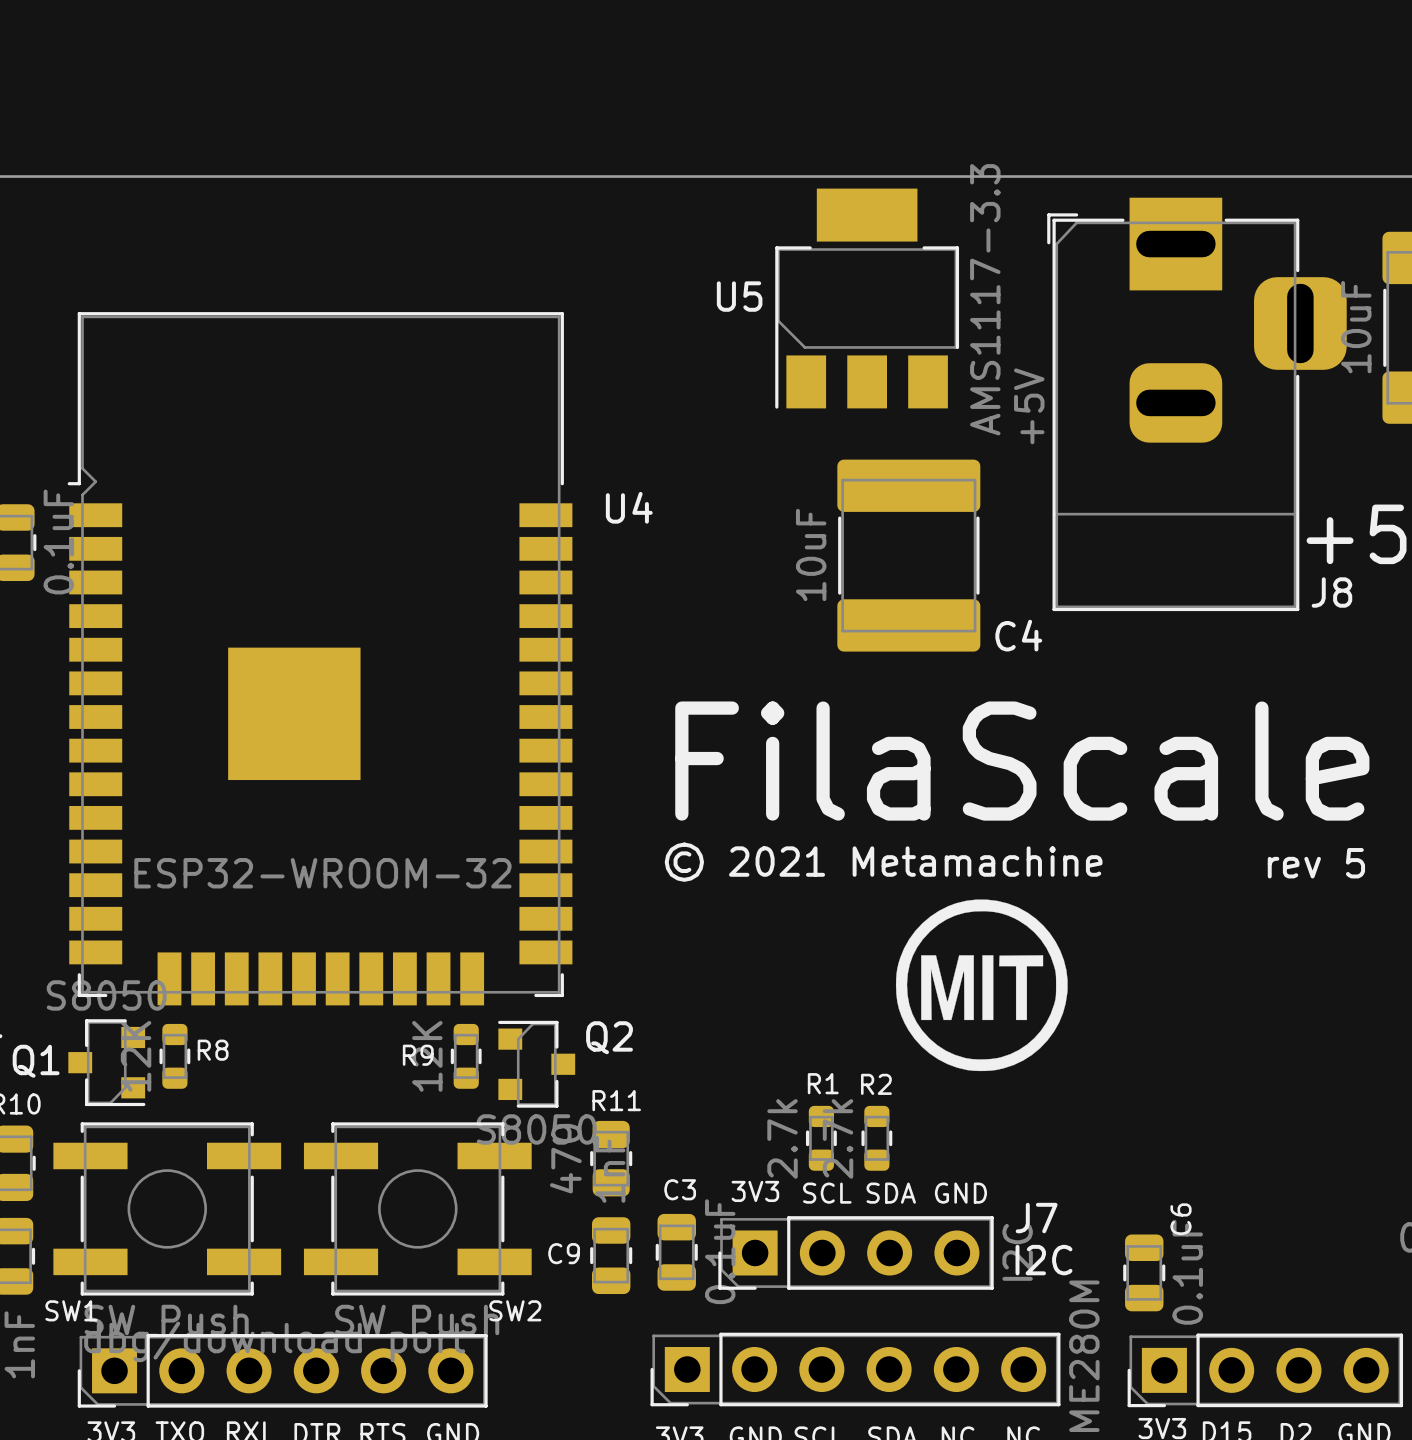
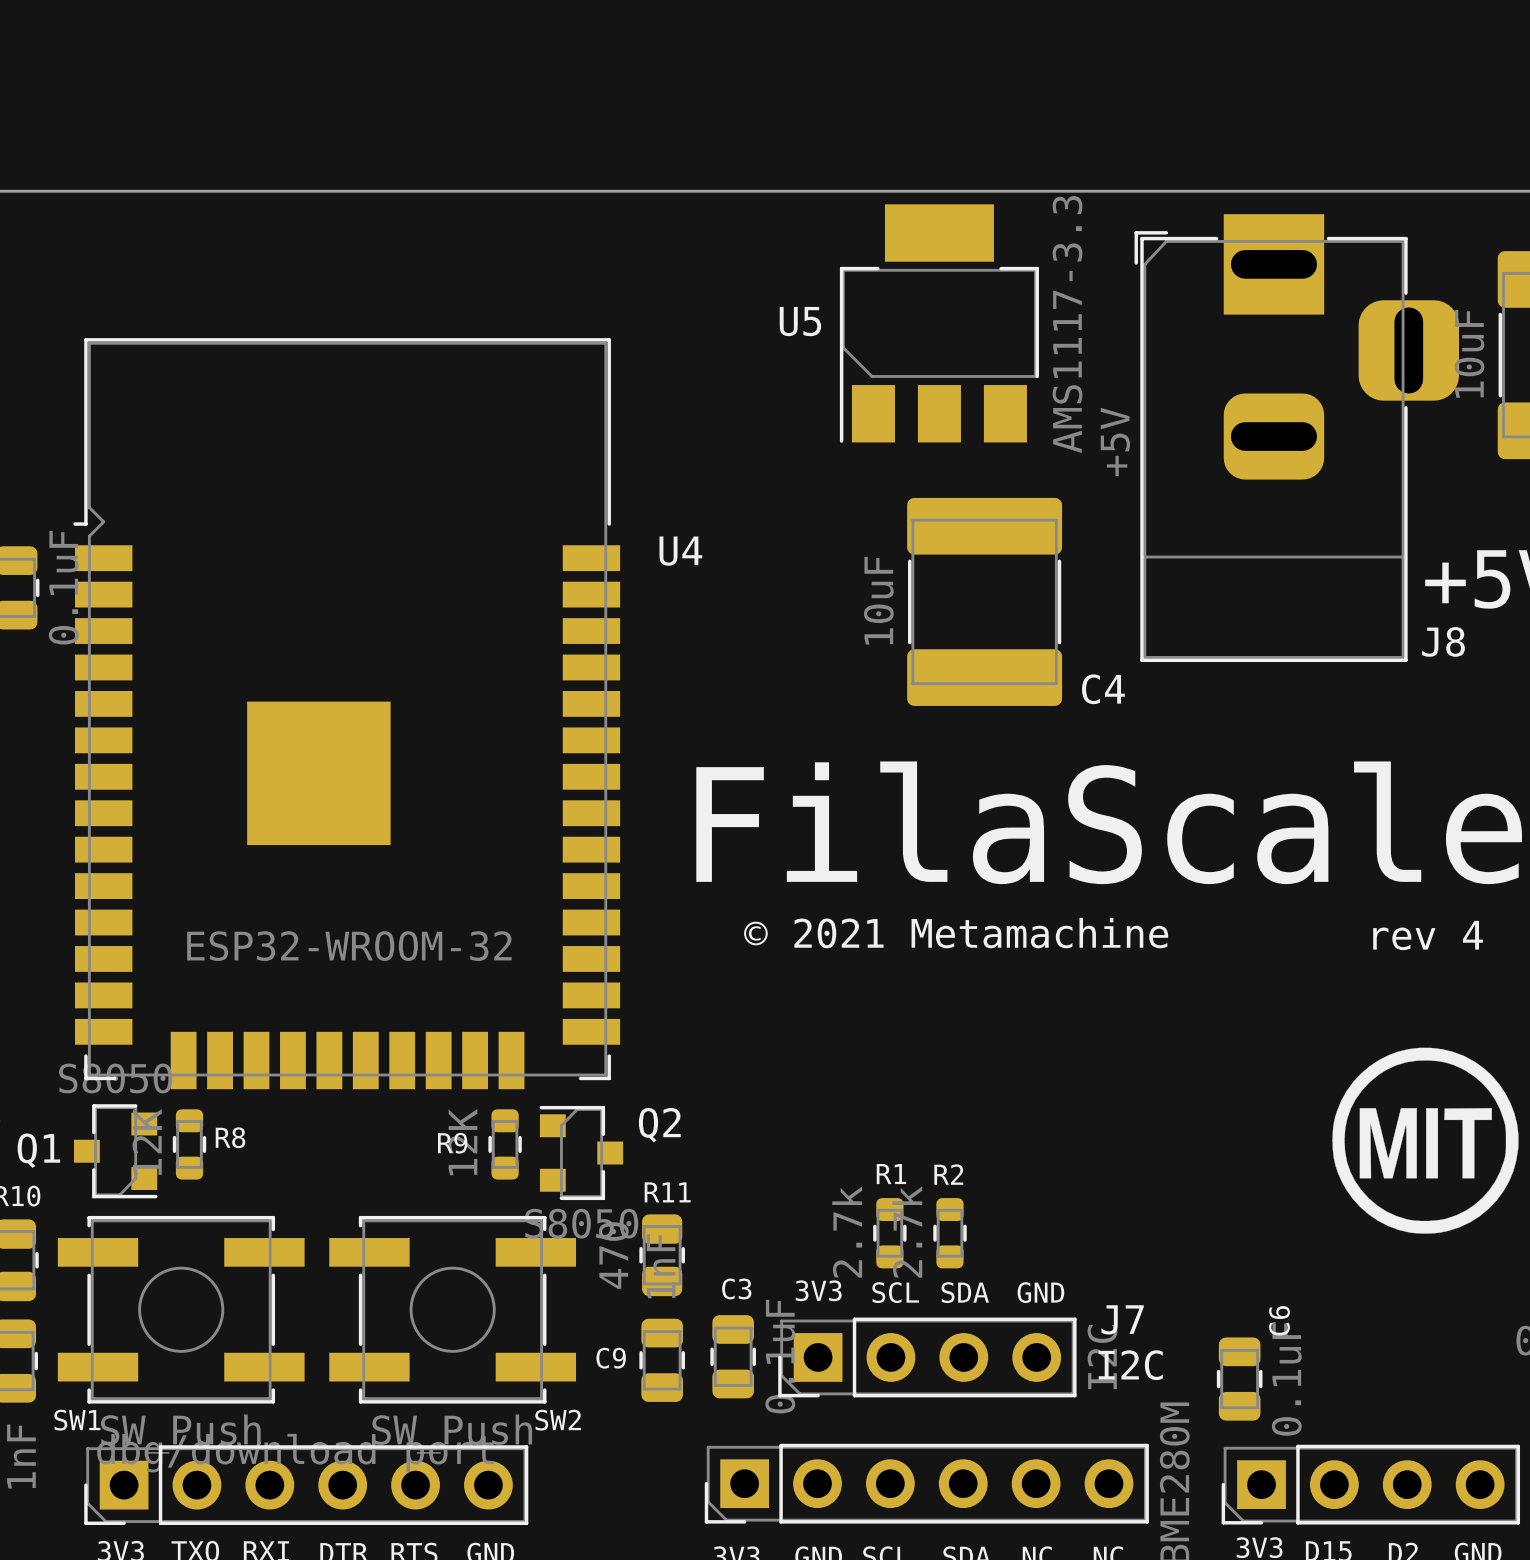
text: rev 5 (1316, 863) -> rev 4 (1428, 935)
drawing position: (981, 985) -> (1425, 1140)

